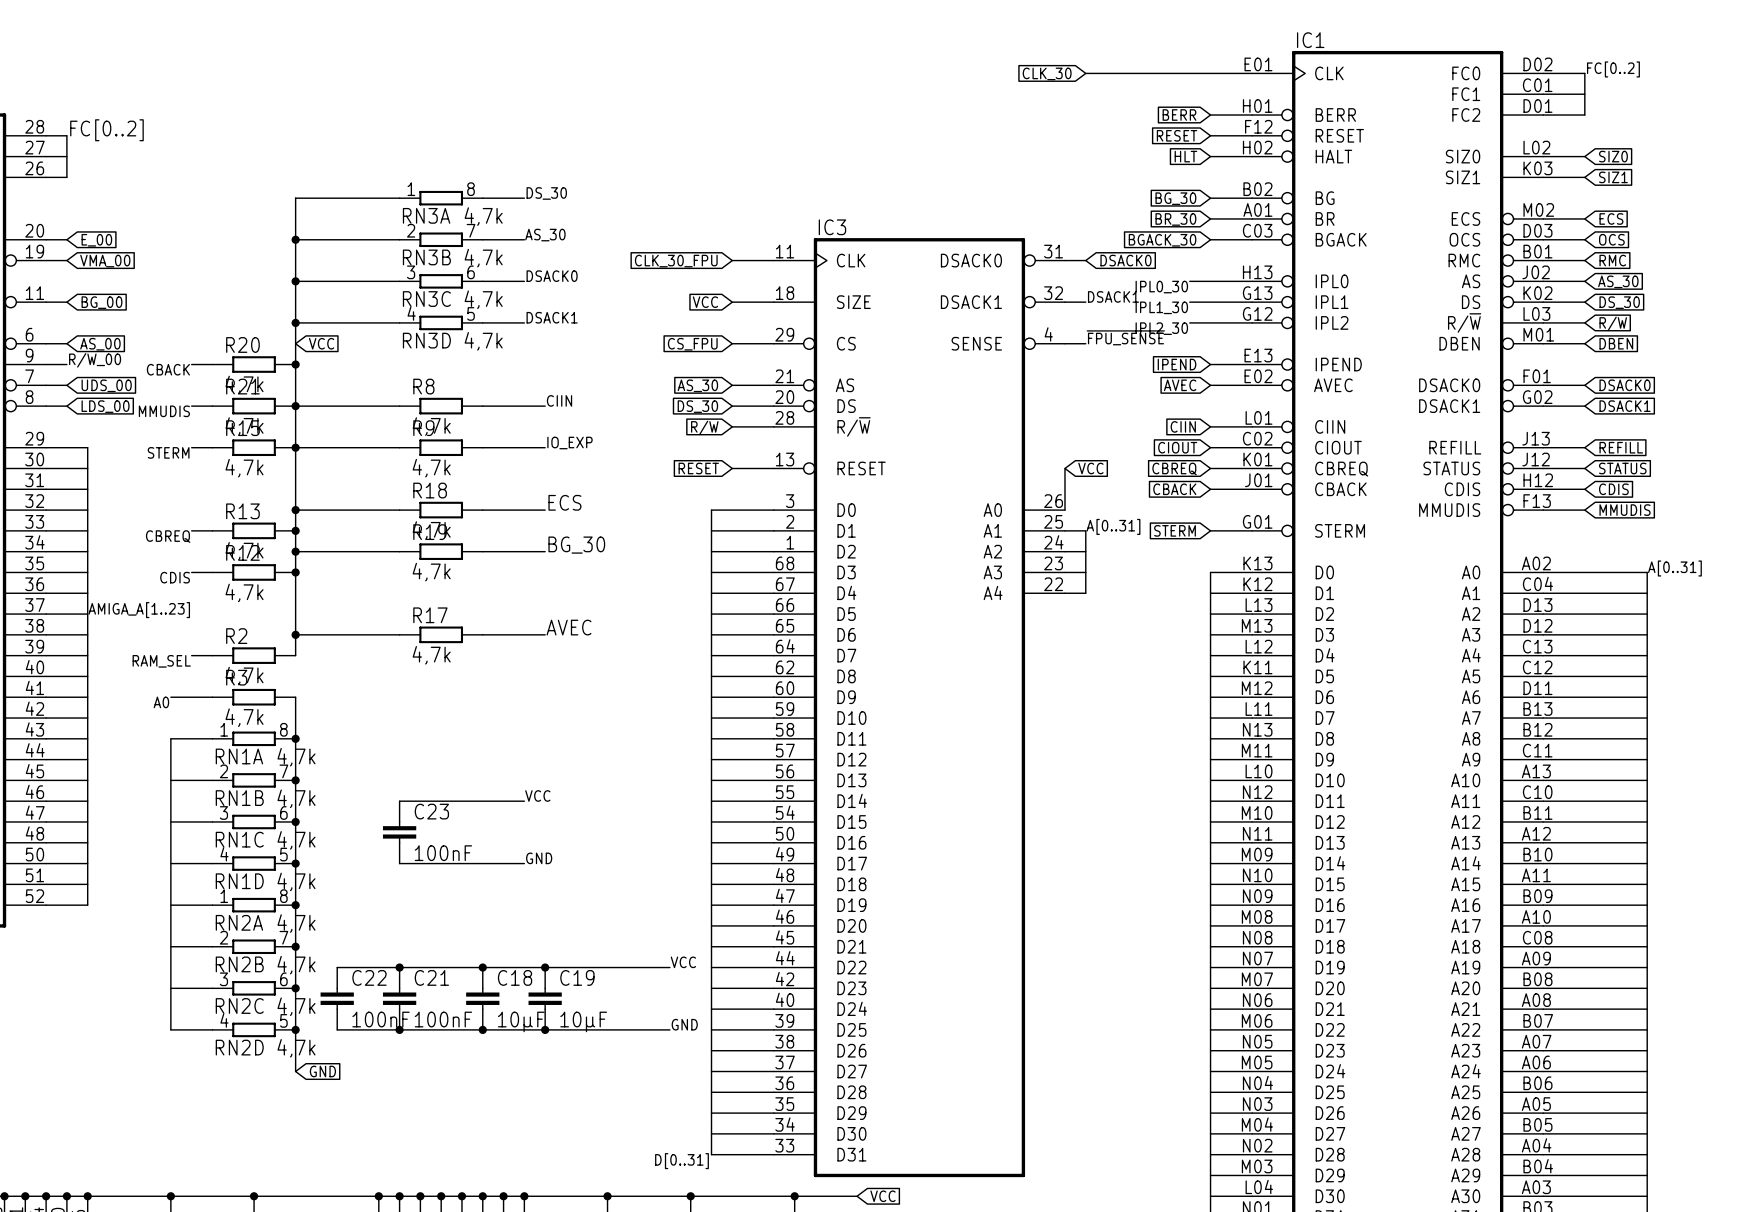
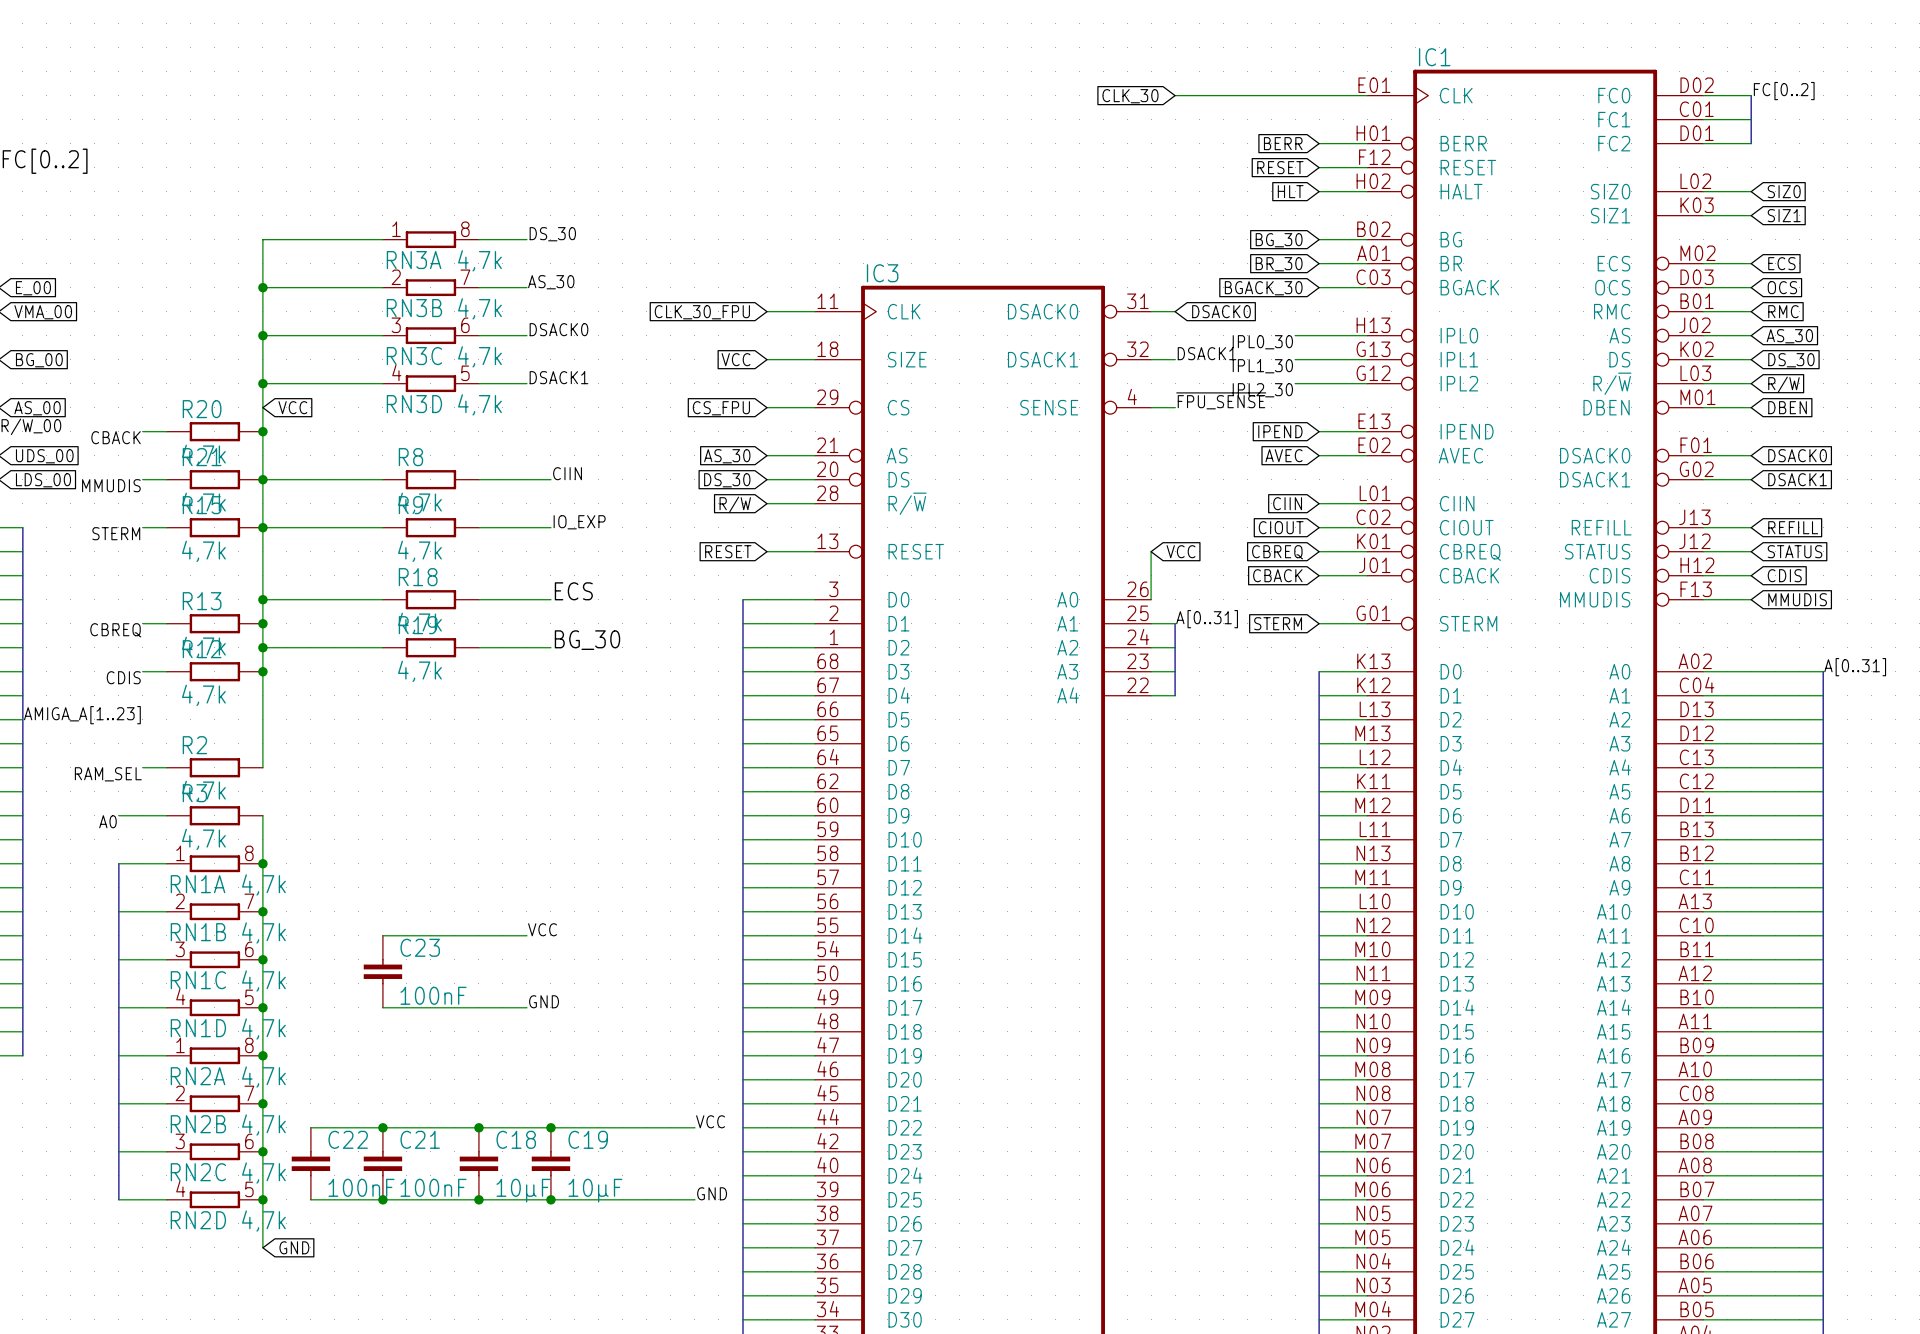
label: AVEC (569, 627) -> none
wire: (295, 634) (399, 634) -> none
junction: (295, 634) -> none
R17: 4,7k (441, 634) -> none
wire: (482, 634) (545, 634) -> none

